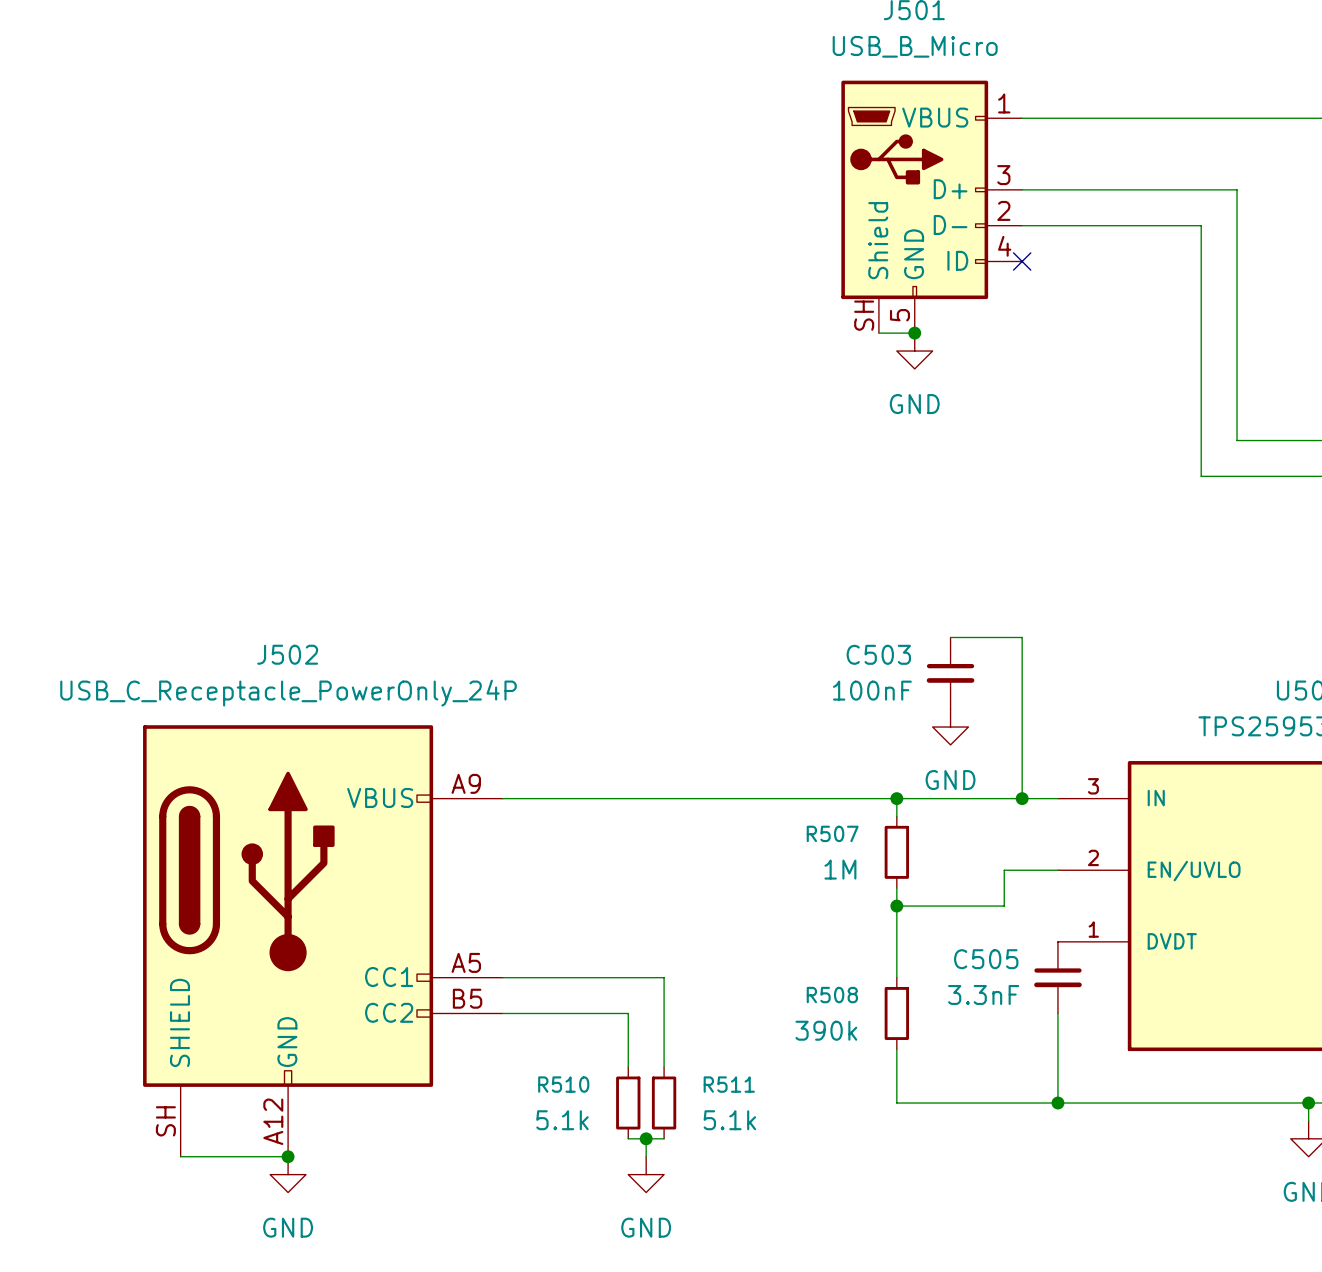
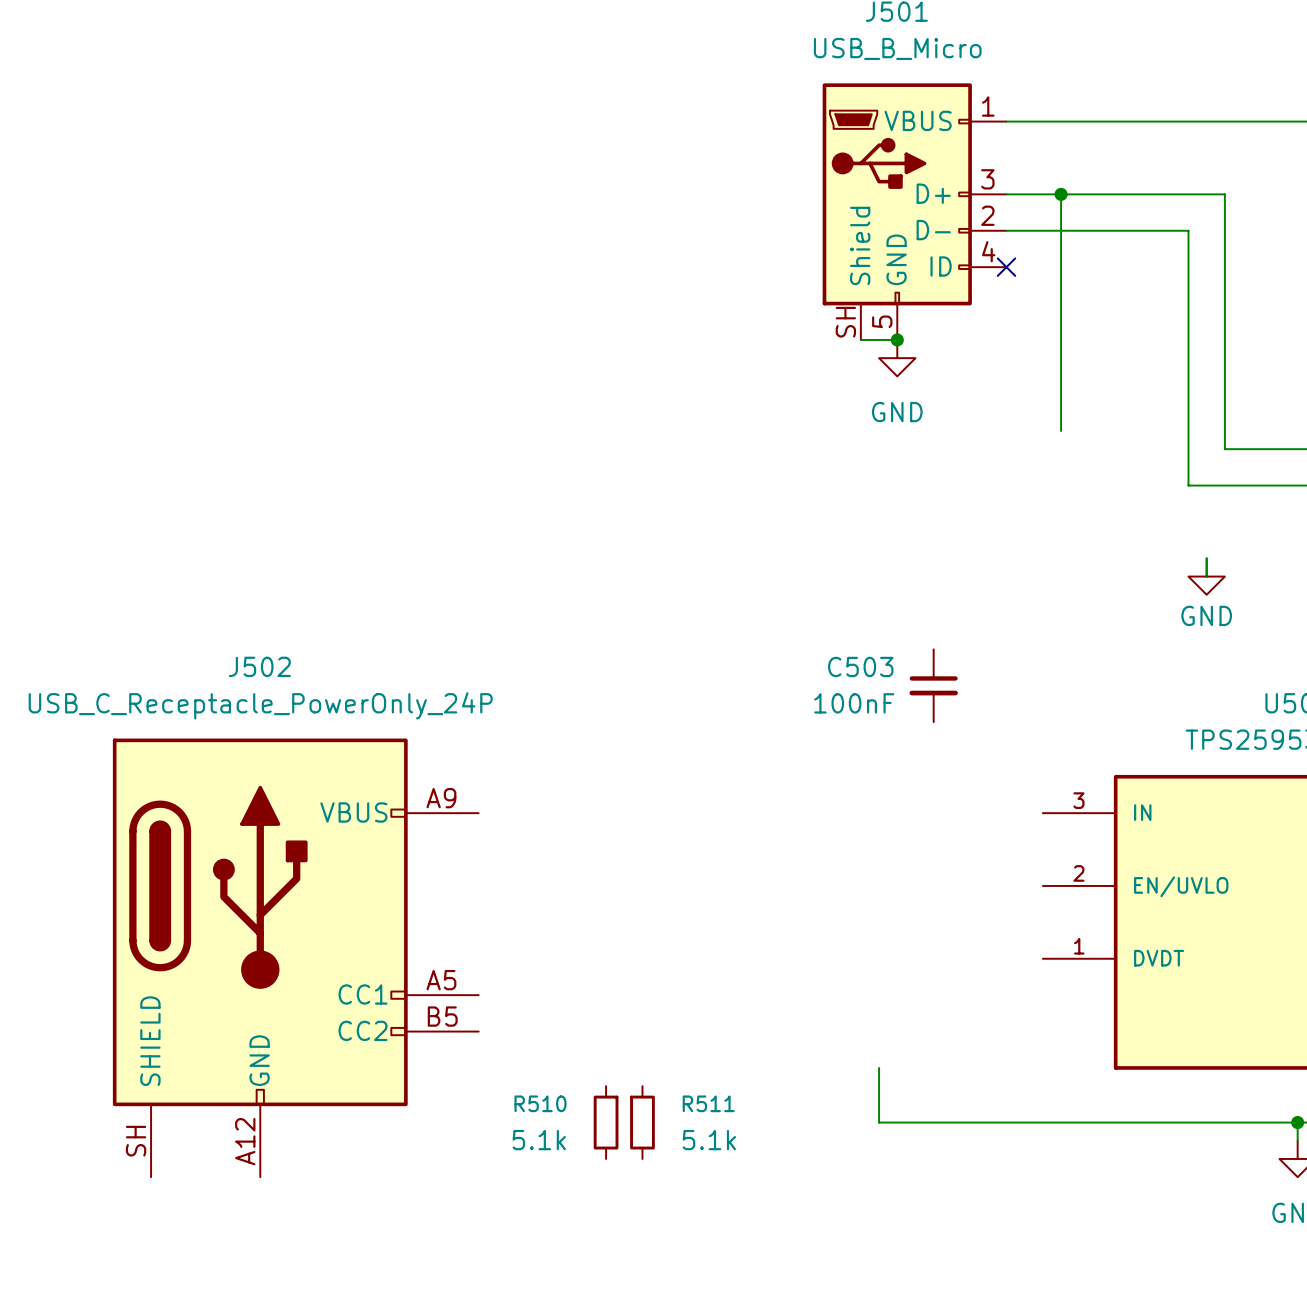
wire: none -> (1061, 194) (1061, 430)
junction: none -> (1061, 194)
wire: none -> (1206, 558) (1206, 576)
wire: (950, 637) (1022, 637) (1022, 798) -> none
power symbol position: GND (950, 727) -> GND (1206, 576)
power symbol text position: GND (950, 780) -> GND (1206, 615)
wire: (502, 798) (1057, 798) -> none
wire: (896, 798) (896, 816) -> none
junction: (896, 798) -> none
junction: (1022, 798) -> none
R507: 1M (896, 852) -> none
wire: (1057, 870) (1004, 870) (1004, 906) (896, 906) -> none
wire: (896, 888) (896, 977) -> none
junction: (896, 906) -> none
wire: (502, 977) (664, 977) (664, 1067) -> none
C505: 3.3nF (1057, 977) -> none
wire: (502, 1013) (628, 1013) (628, 1067) -> none
R508: 390k (896, 1013) -> none
wire: (1057, 1013) (1057, 1103) -> none
junction: (1057, 1103) -> none
wire: (628, 1138) (664, 1138) -> none
wire: (646, 1138) (646, 1156) -> none
junction: (646, 1138) -> none
wire: (180, 1156) (288, 1156) -> none
junction: (288, 1156) -> none
power symbol: GND (288, 1174) -> none
power symbol: GND (646, 1174) -> none

